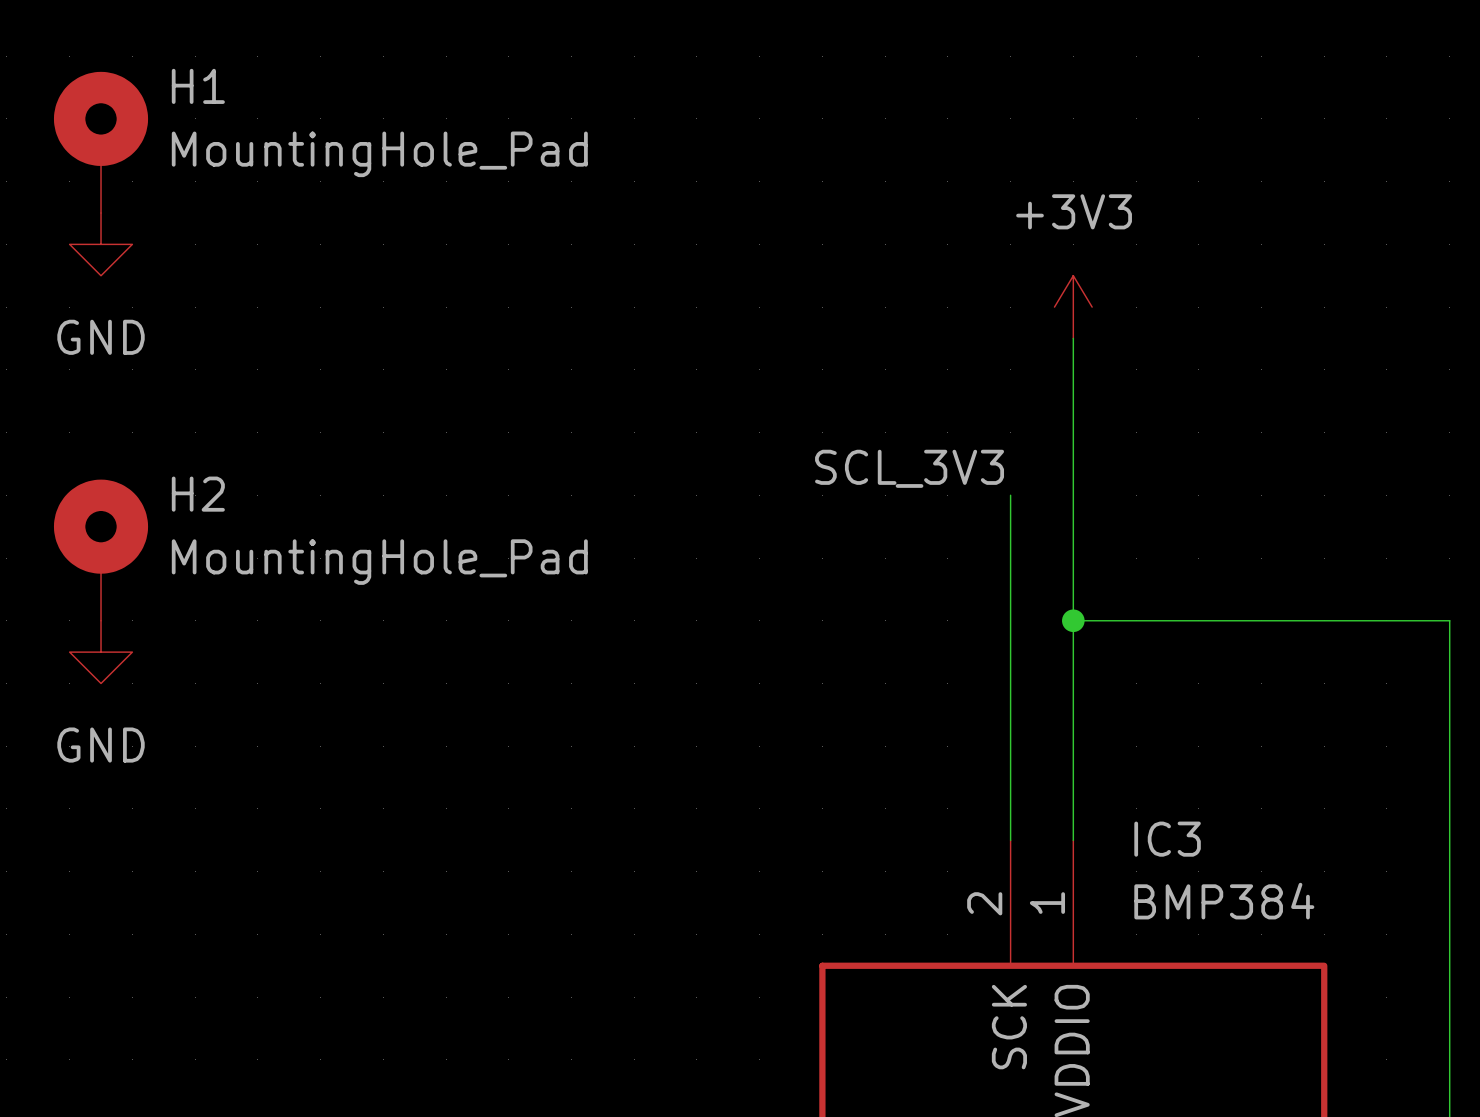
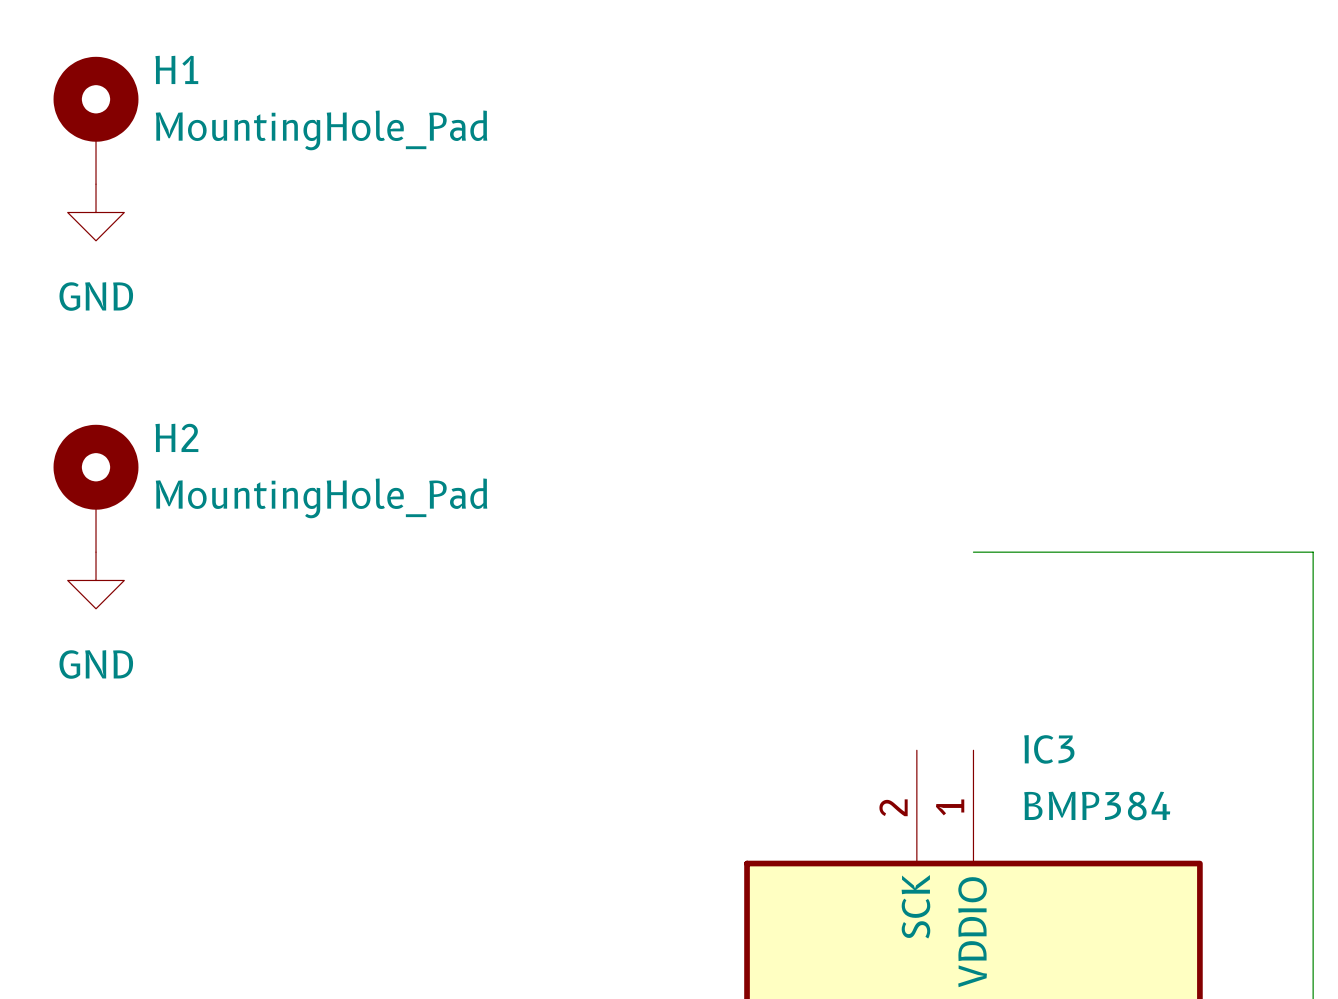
power symbol: +3V3 (1073, 307) -> none
wire: (1073, 338) (1073, 840) -> none
label: SCL_3V3 (909, 468) -> none
wire: (1010, 495) (1010, 840) -> none
junction: (1073, 620) -> none

